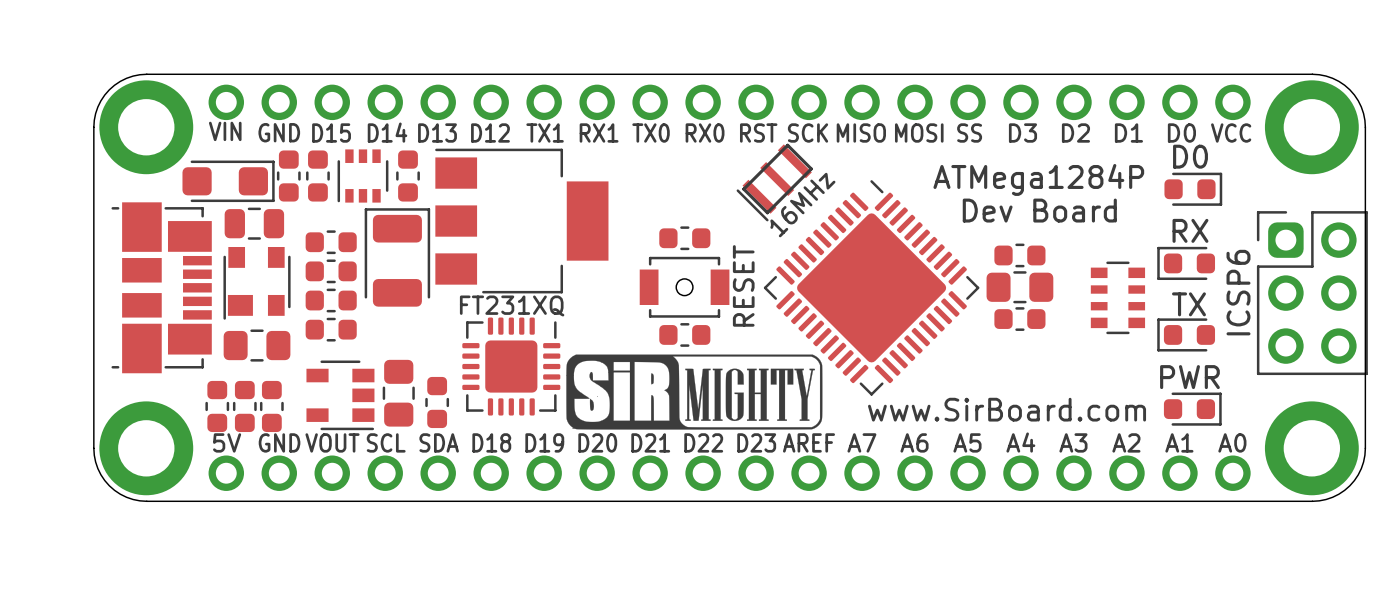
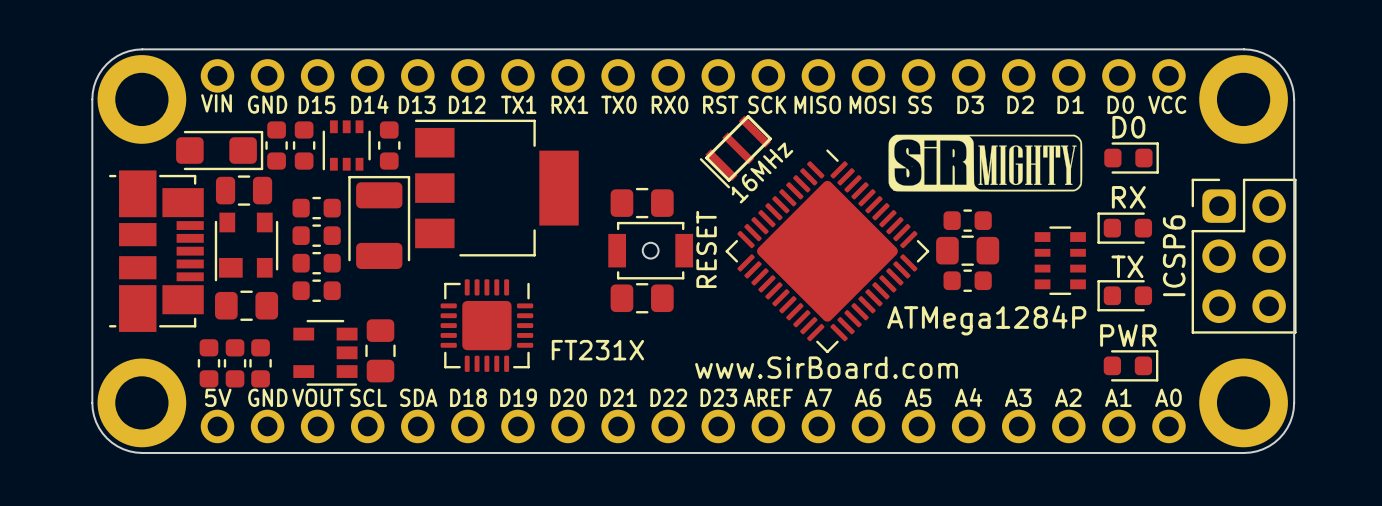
drawing: none -> [888, 134, 1083, 192]
text position: ATMega1284P (1038, 179) -> ATMega1284P (986, 320)
text: Dev Board (1039, 210) -> none
part footprint: [659, 226, 711, 251] -> [610, 187, 674, 219]
FT231XQ name: FT231XQ (512, 305) -> FT231X (597, 350)
part footprint: [659, 323, 711, 347] -> [610, 283, 674, 314]
drawing: [566, 354, 823, 430] -> none
part: (437, 402) -> none
www.SirBoard.com name position: www.SirBoard.com (1007, 409) -> www.SirBoard.com (826, 367)

